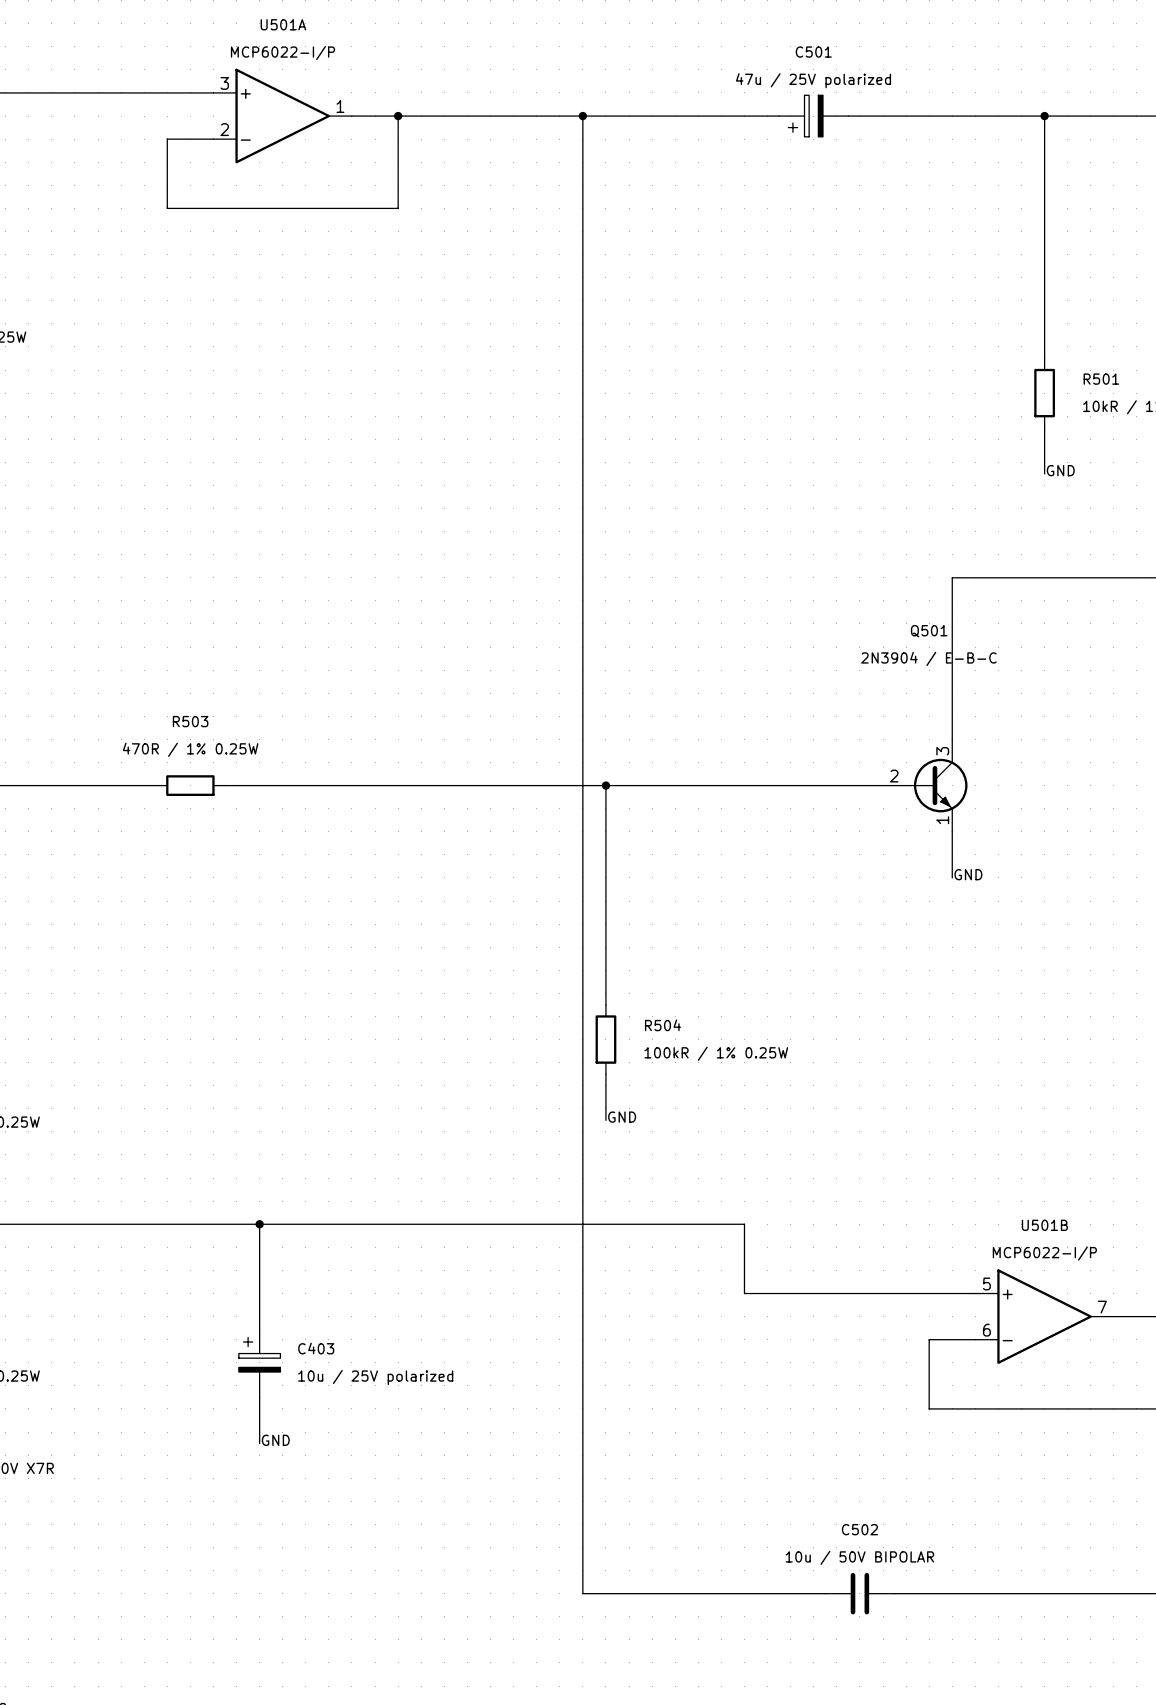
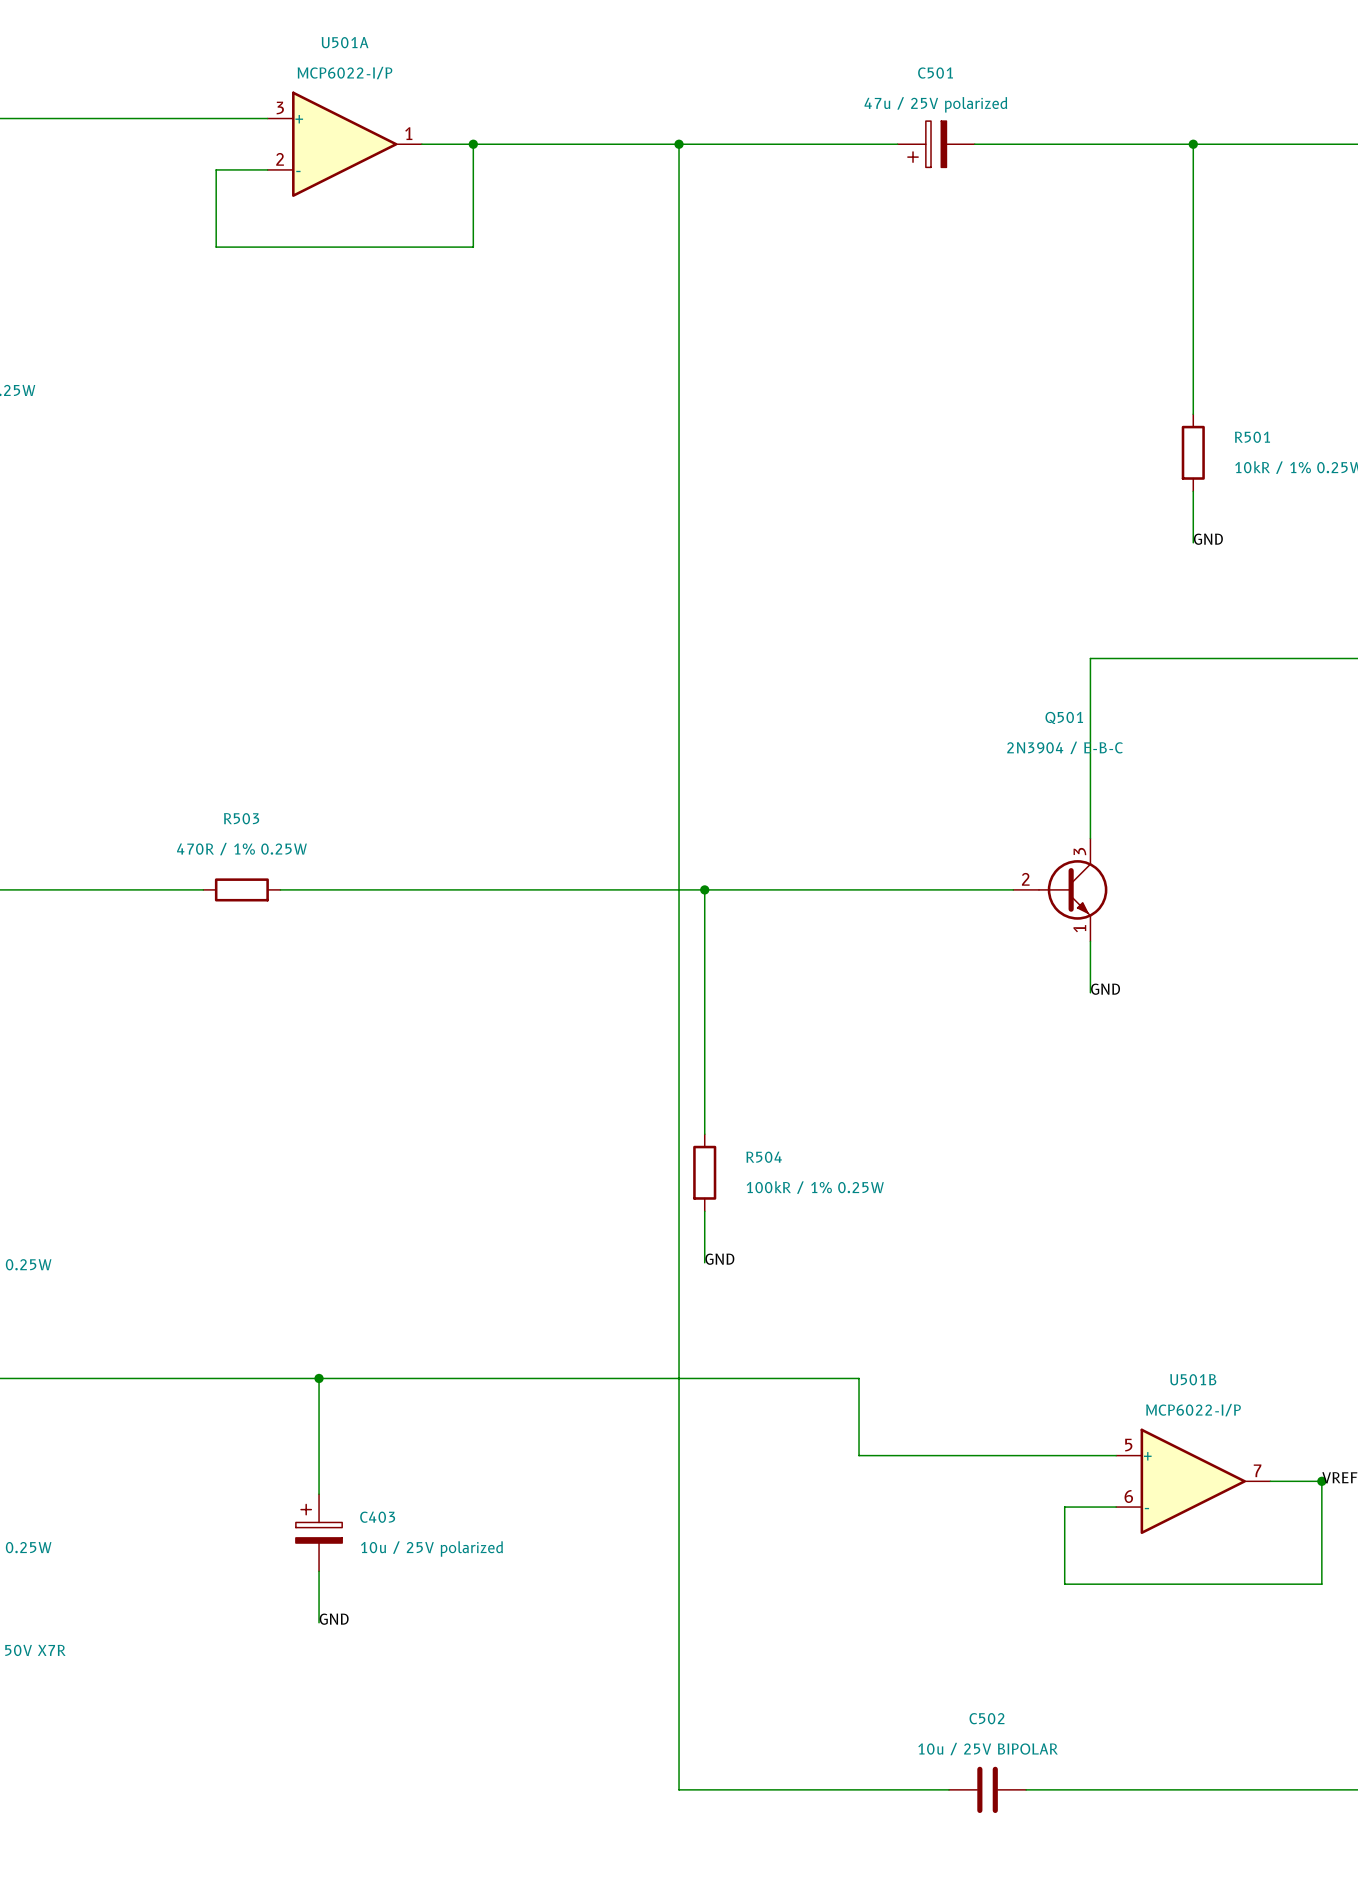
C502 value: 10u / 50V BIPOLAR (859, 1557) -> 10u / 25V BIPOLAR (988, 1749)

